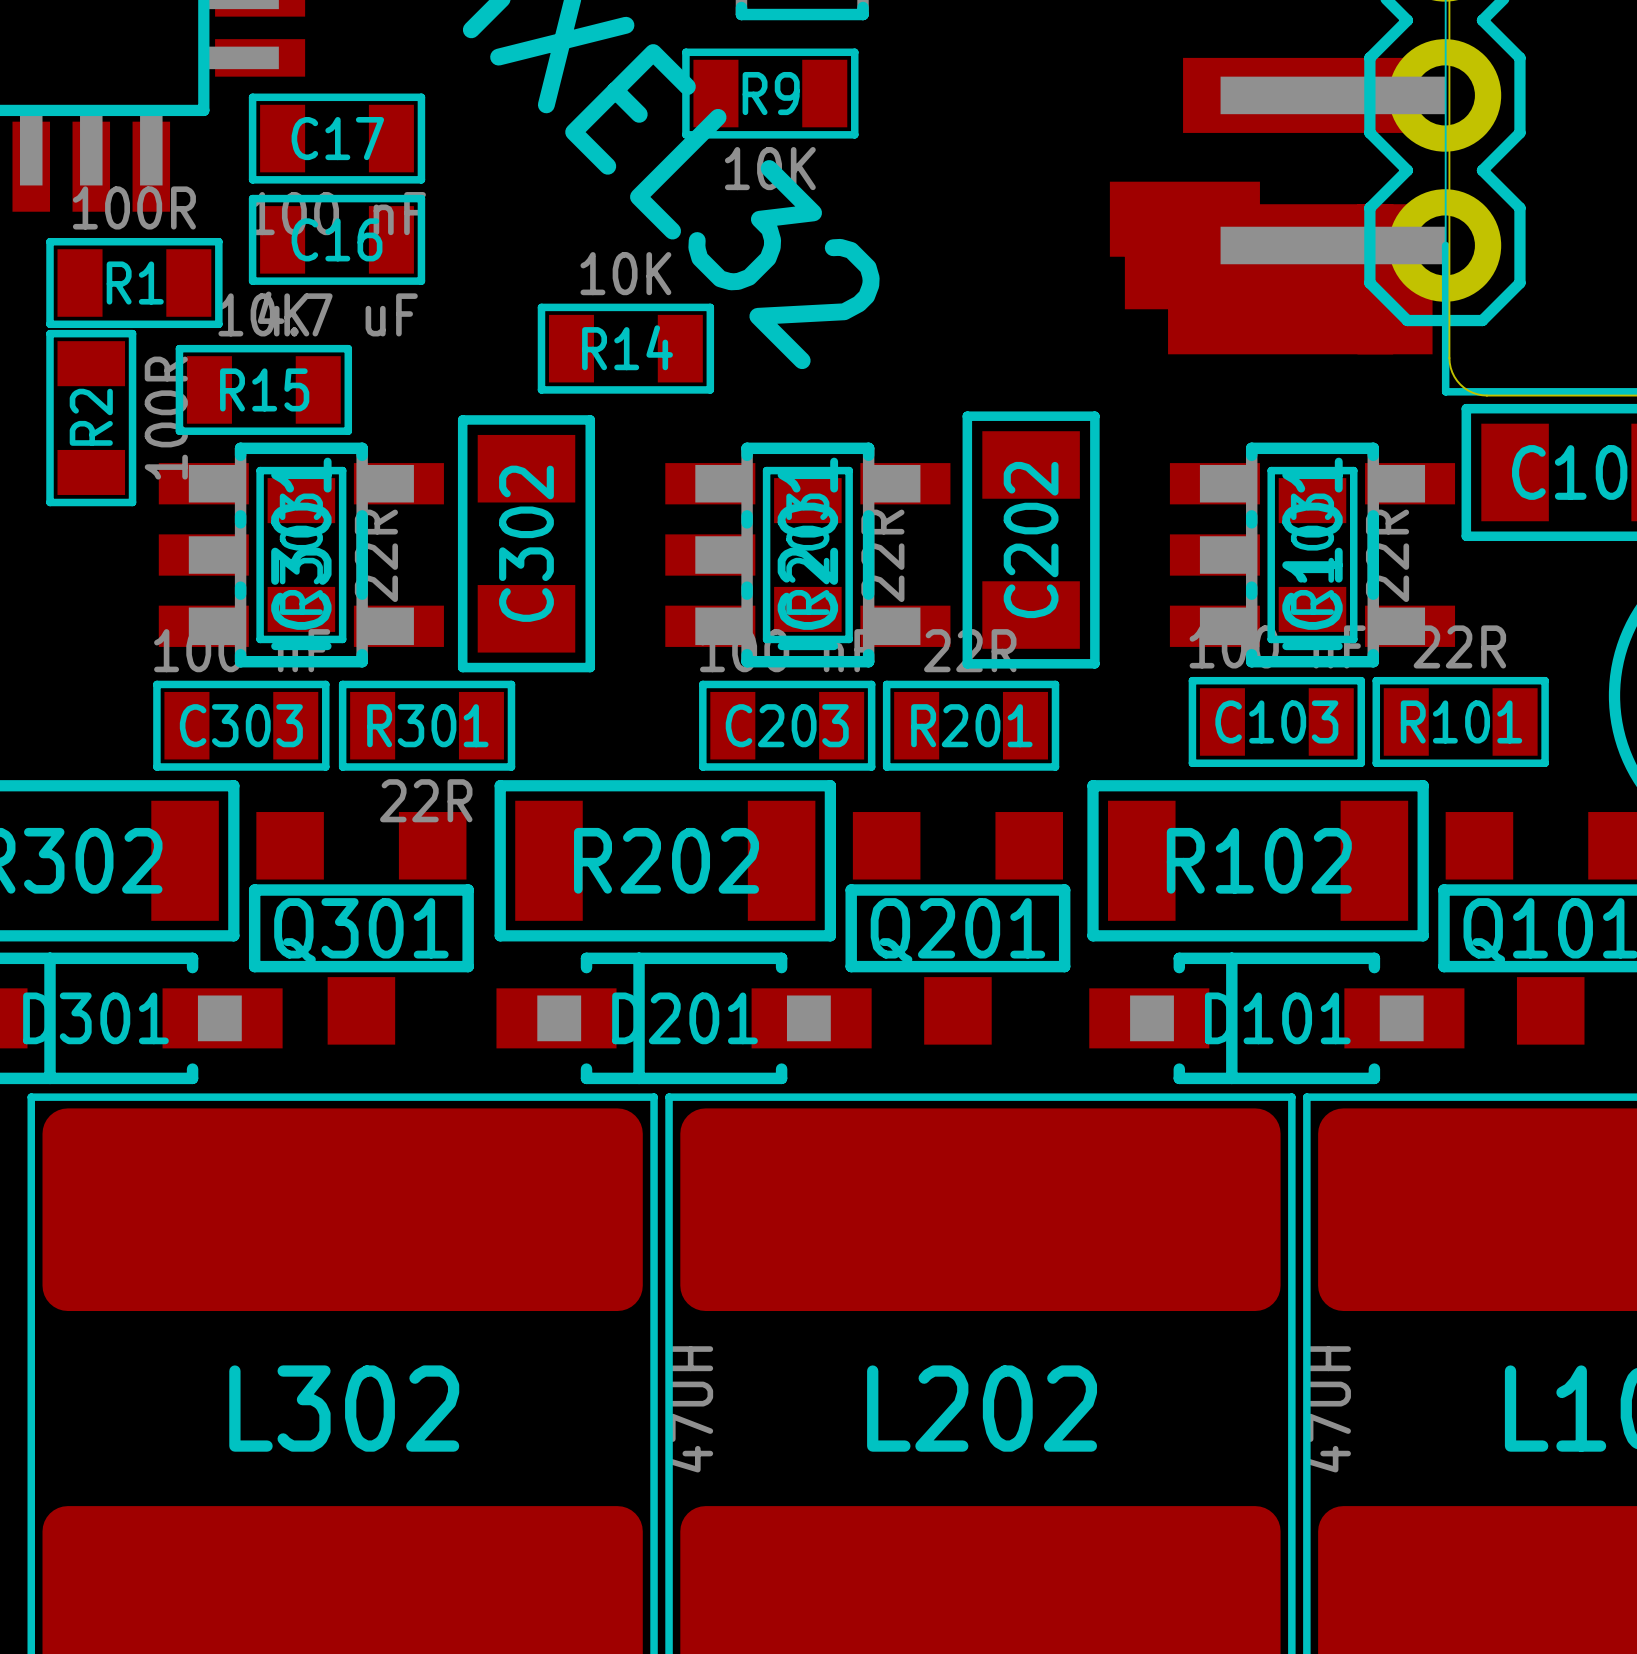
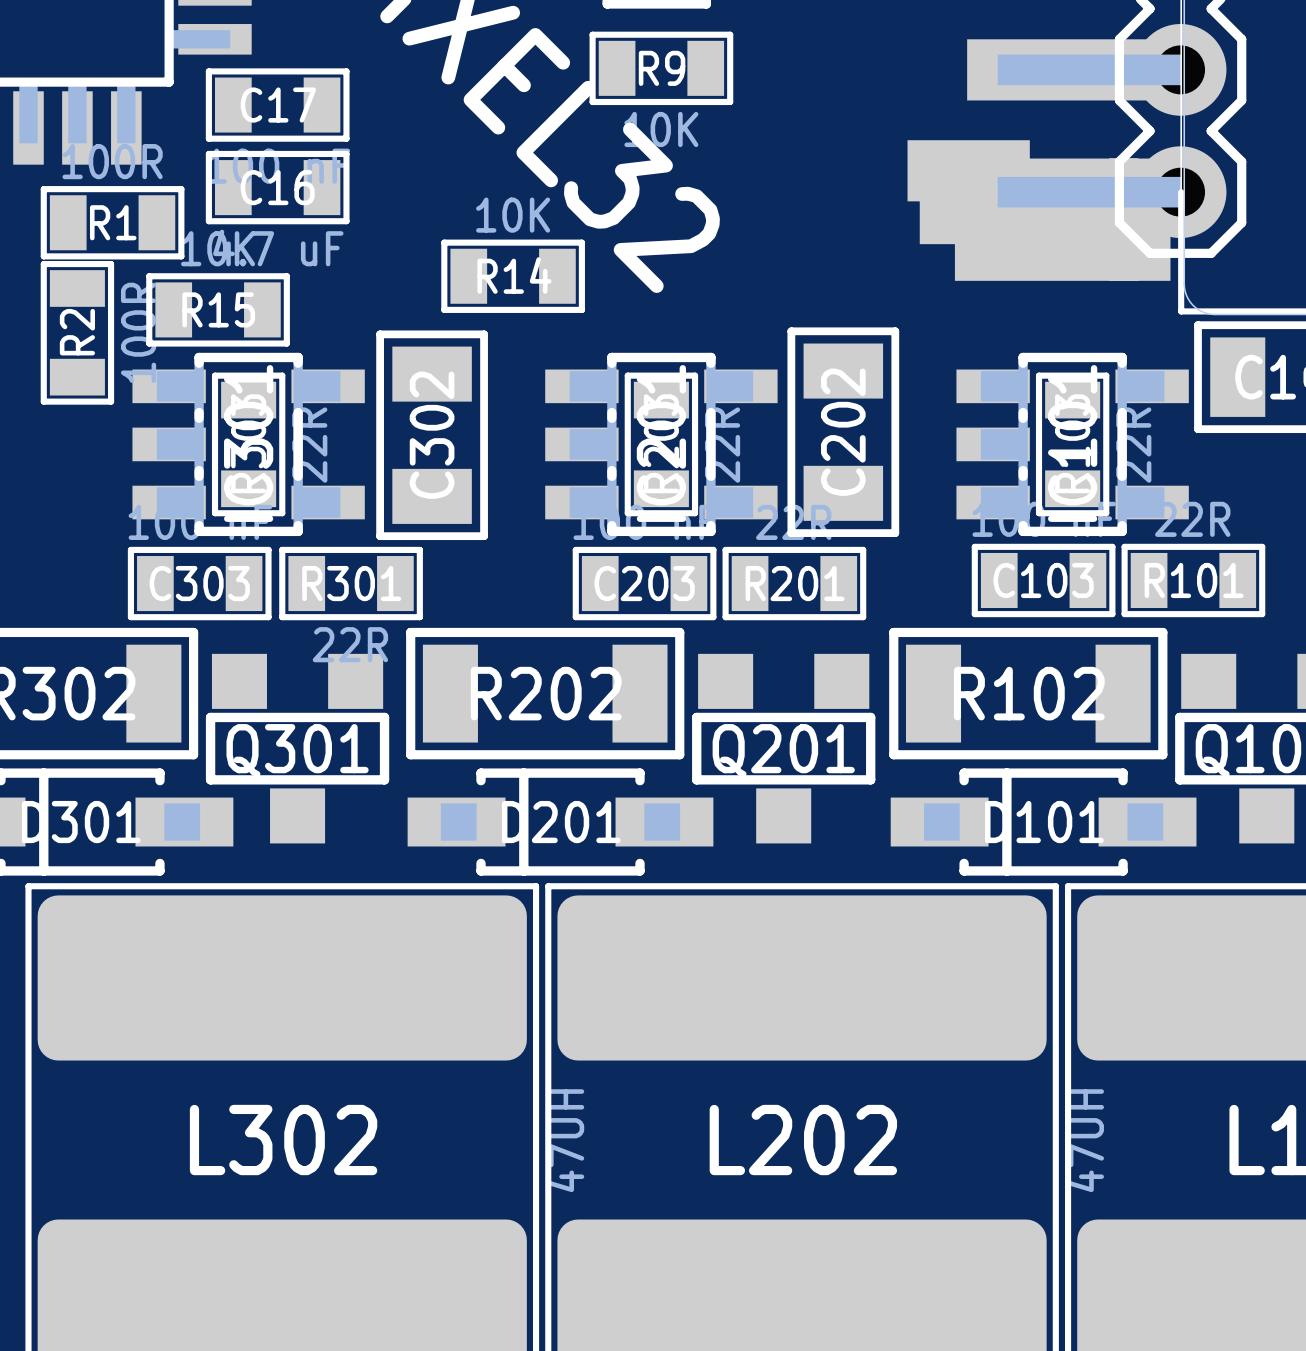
R9 position: (770, 93) -> (661, 68)

